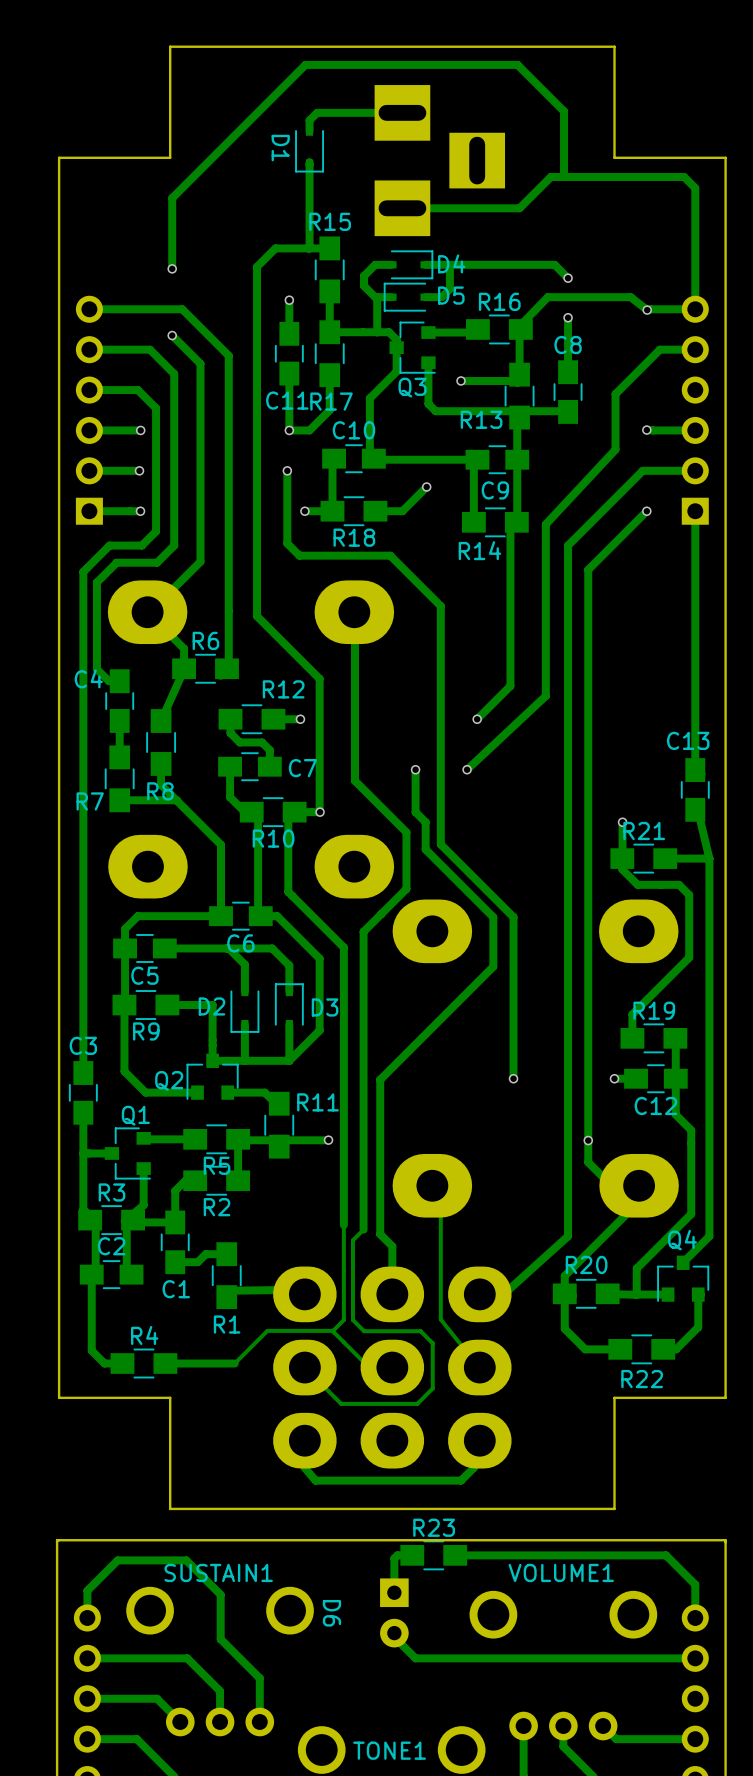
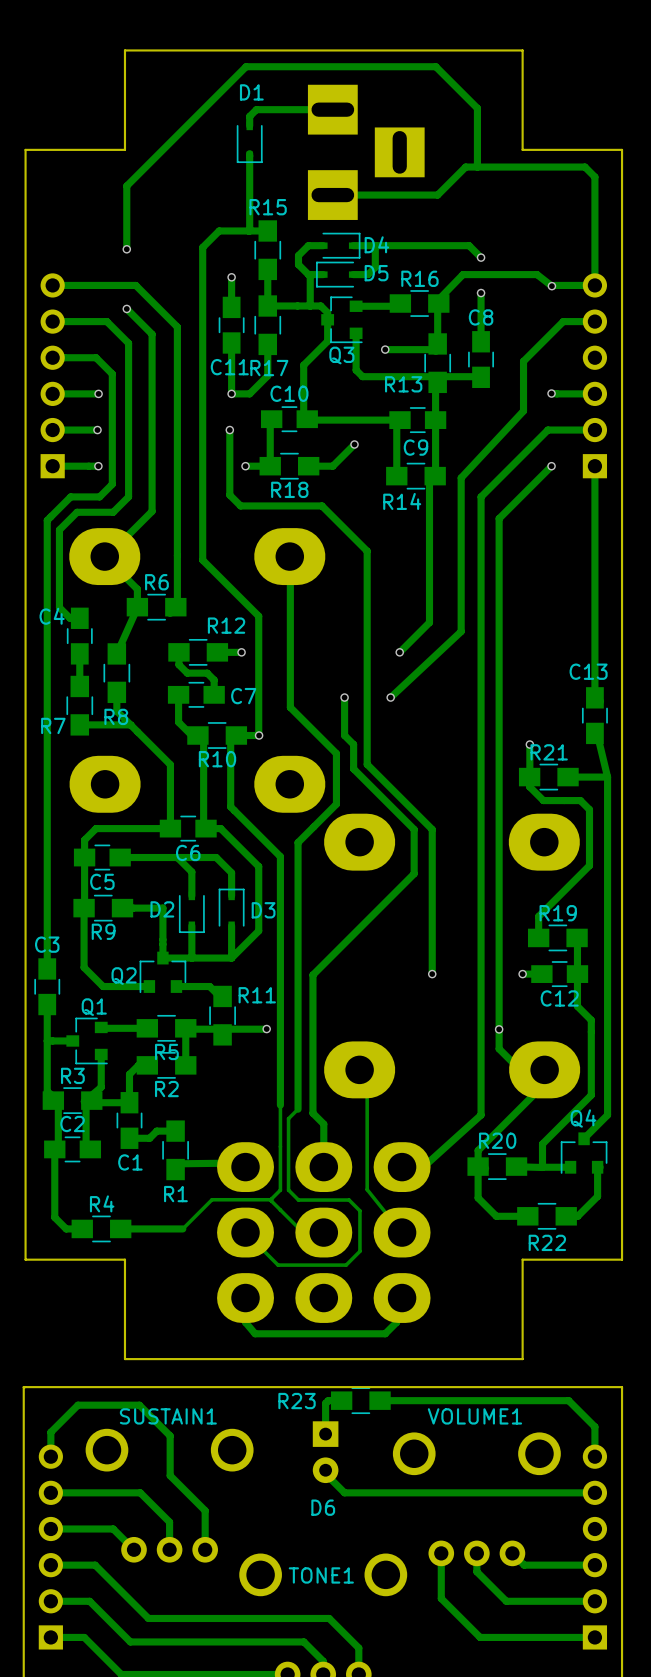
D1 name rotation: 0° (280, 148) -> 90° counterclockwise (251, 92)
D1 name position: D1 (280, 148) -> D1 (251, 92)
R23 name position: R23 (434, 1527) -> R23 (297, 1401)
D6 name rotation: 0° (331, 1613) -> 90° counterclockwise (323, 1507)
D6 name position: D6 (331, 1613) -> D6 (323, 1507)

